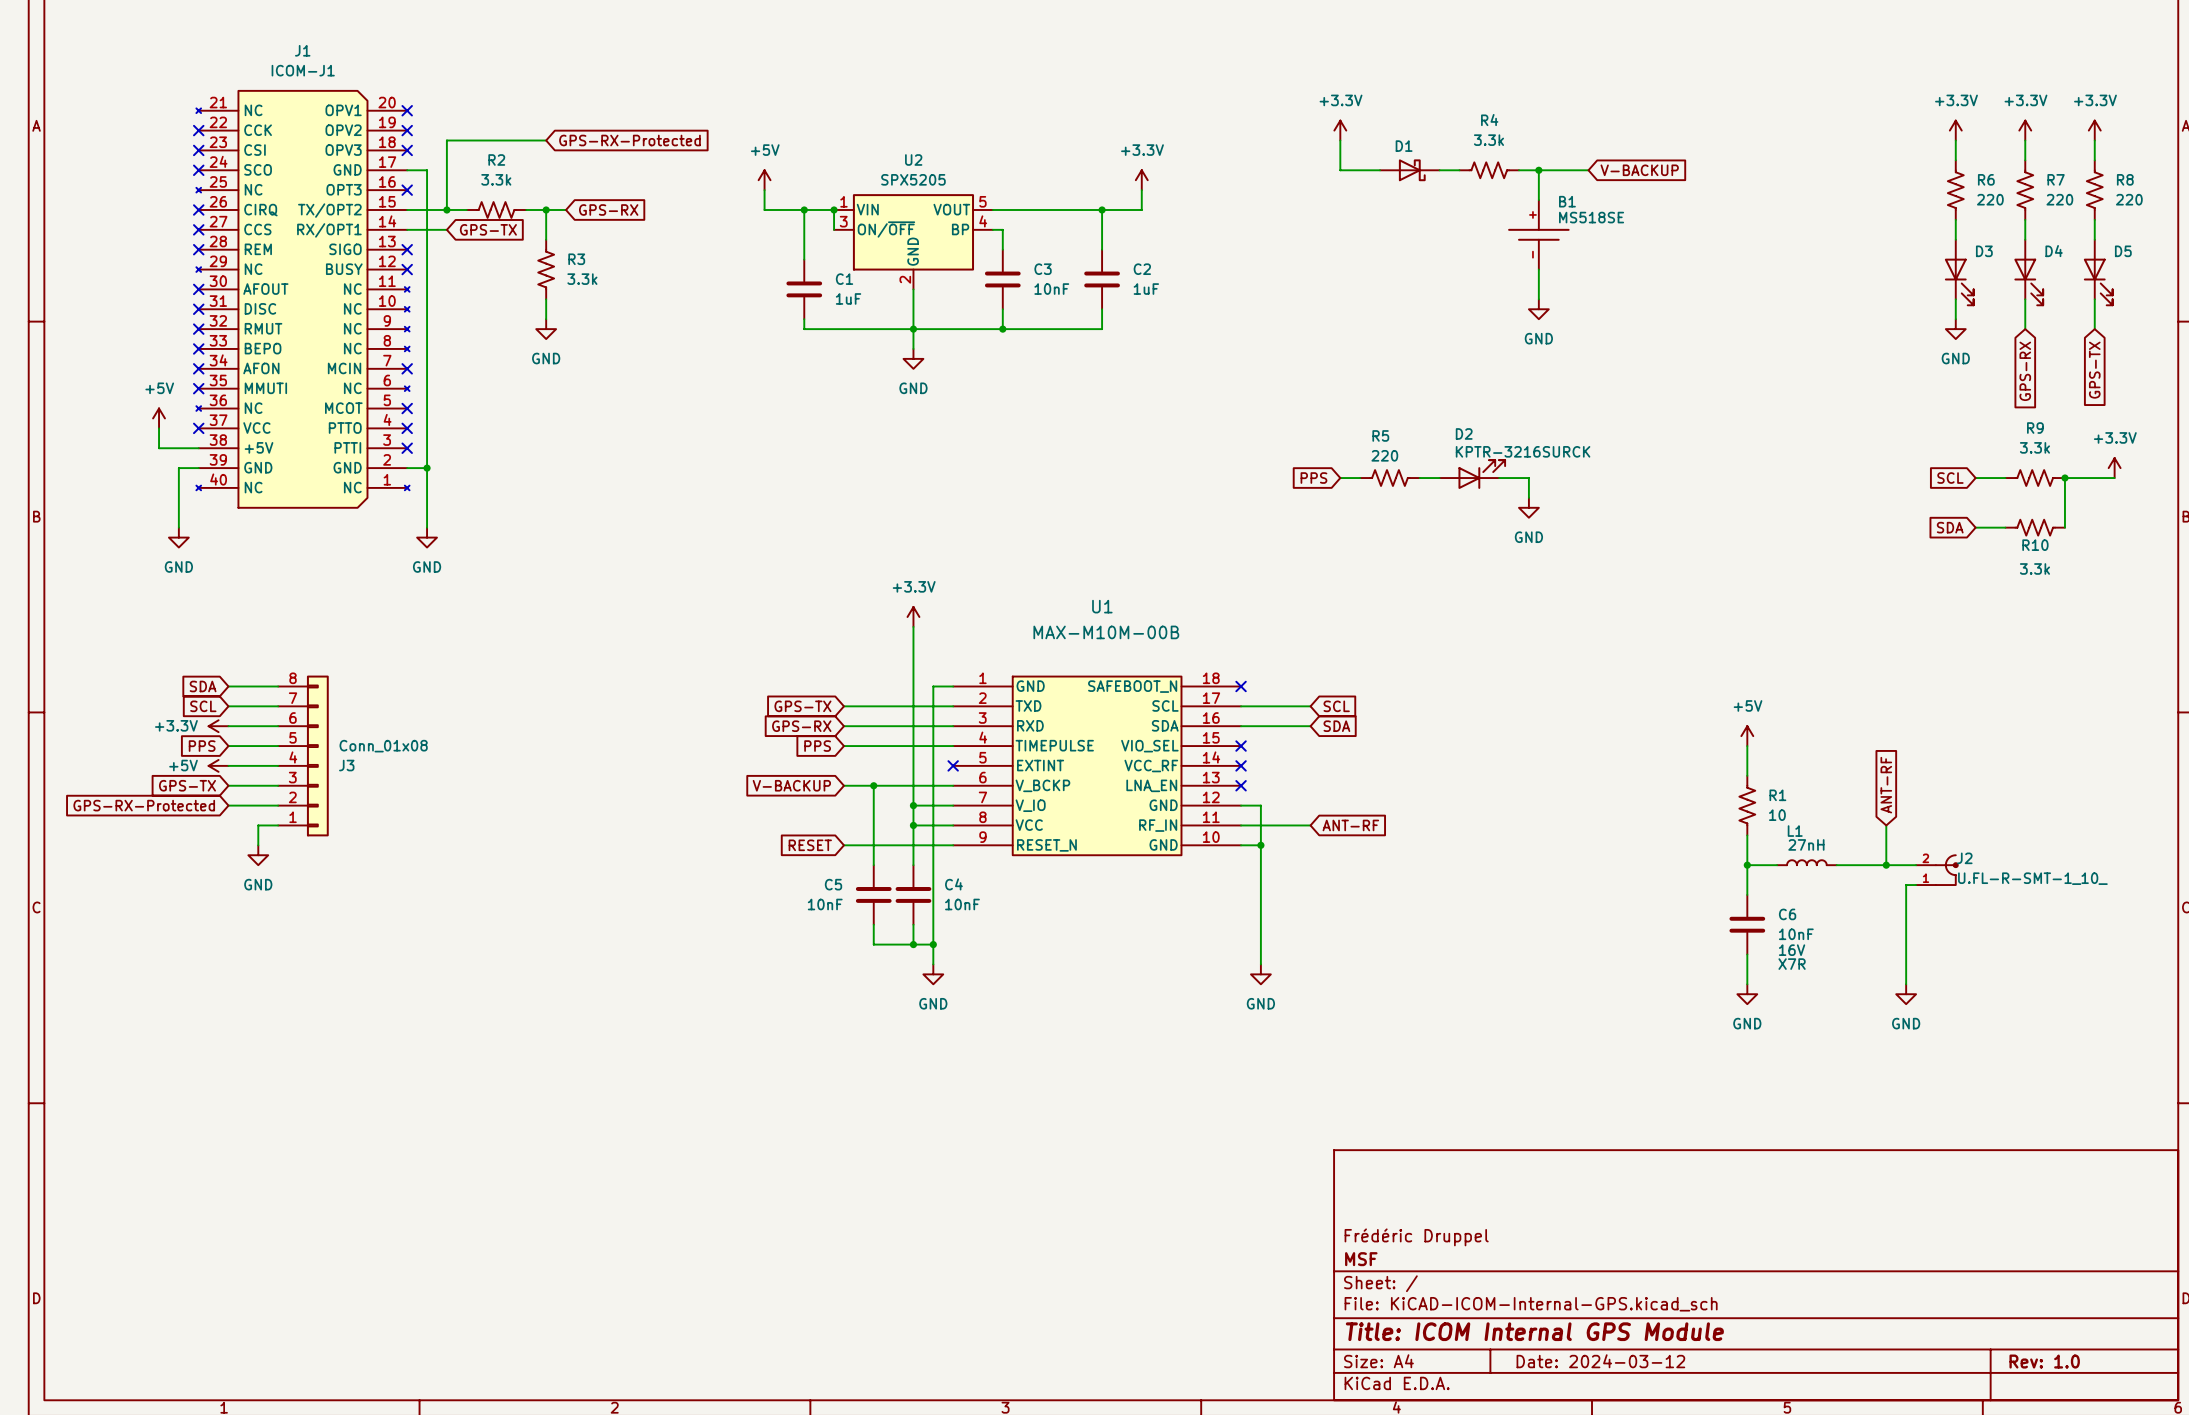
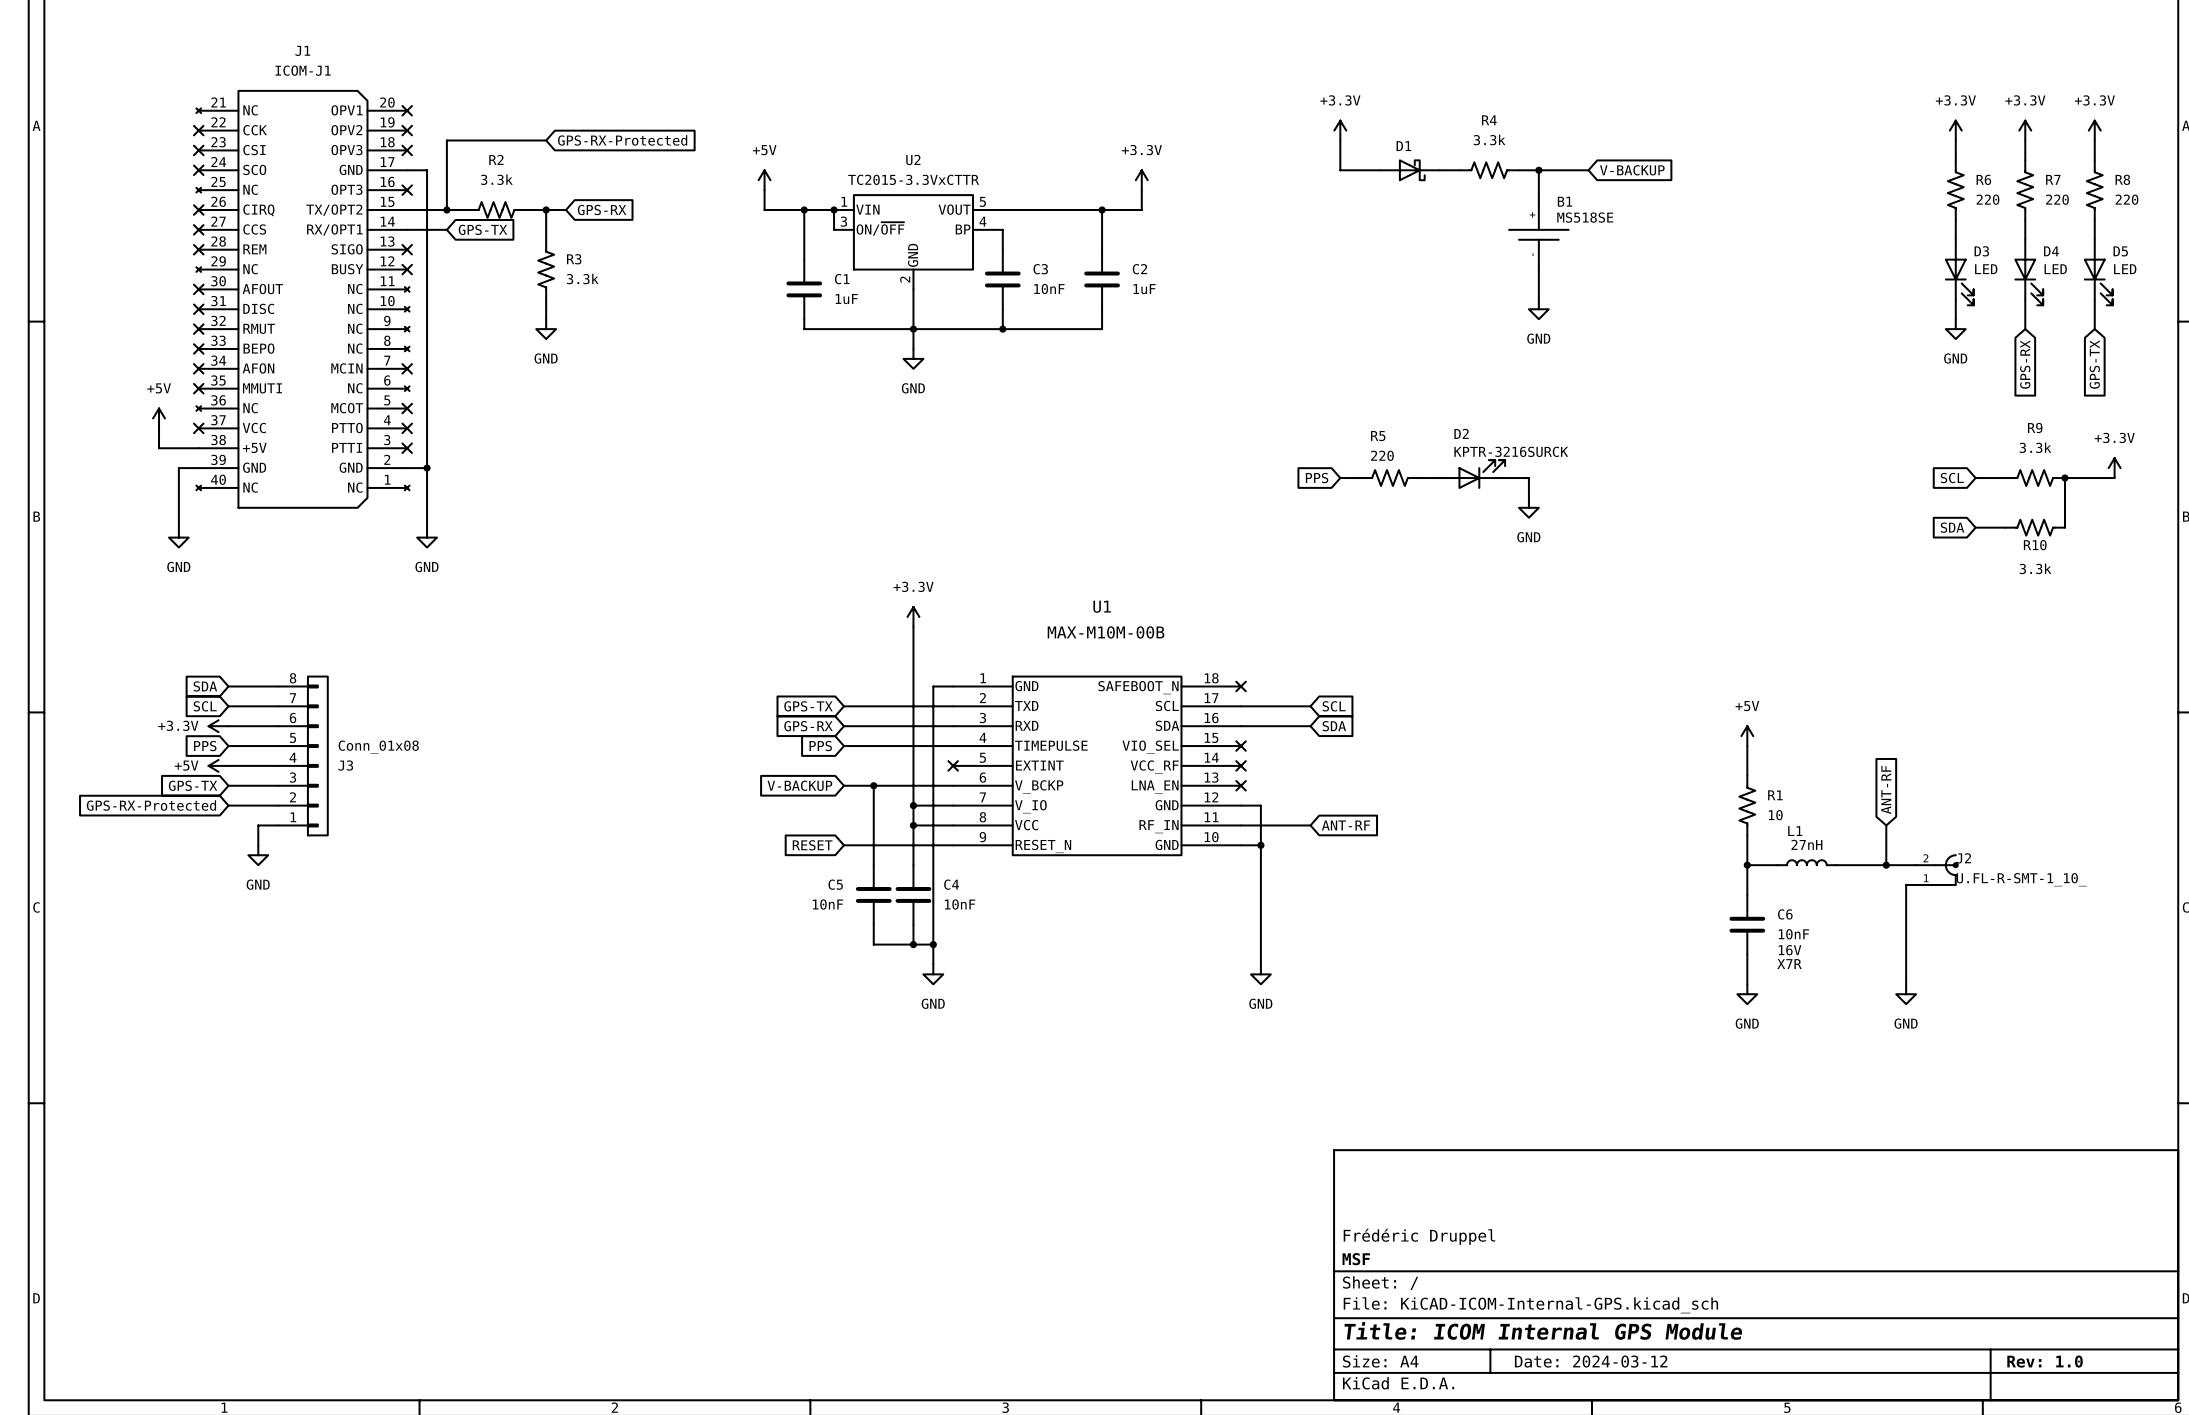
U2 value: SPX5205 (913, 179) -> TC2015-3.3VxCTTR (913, 179)
D3 value: none -> LED (1986, 269)
D4 value: none -> LED (2055, 269)
D5 value: none -> LED (2125, 269)

